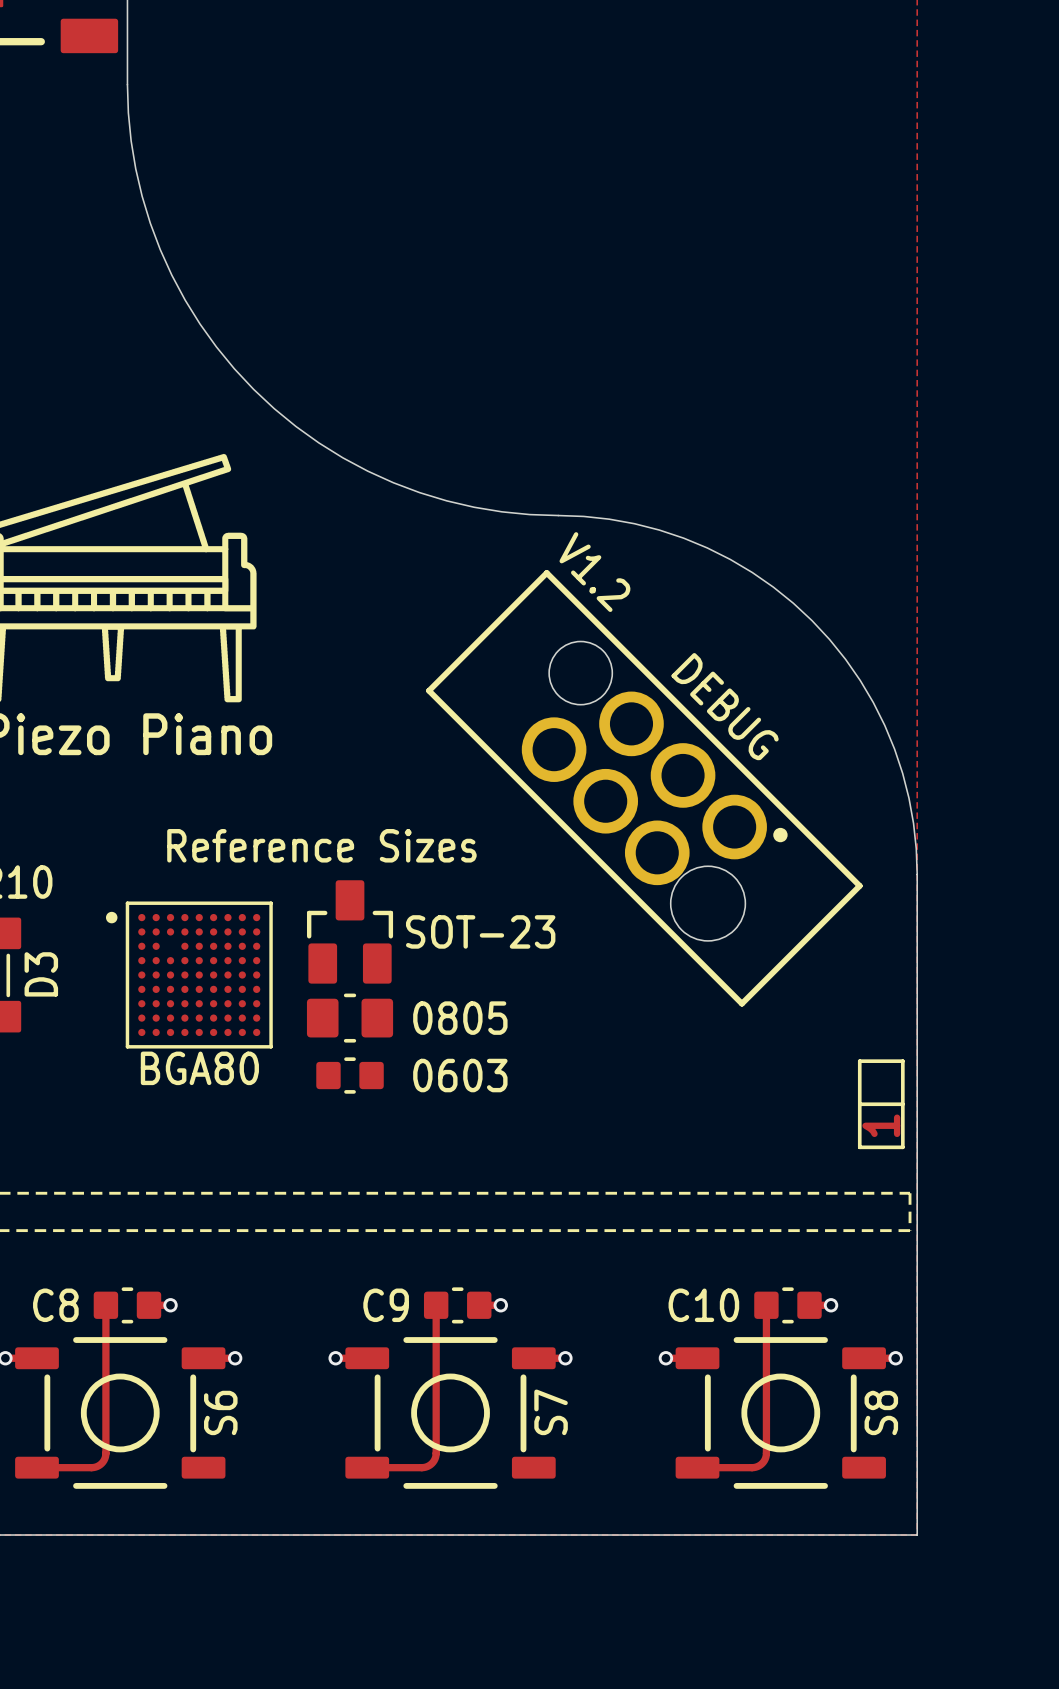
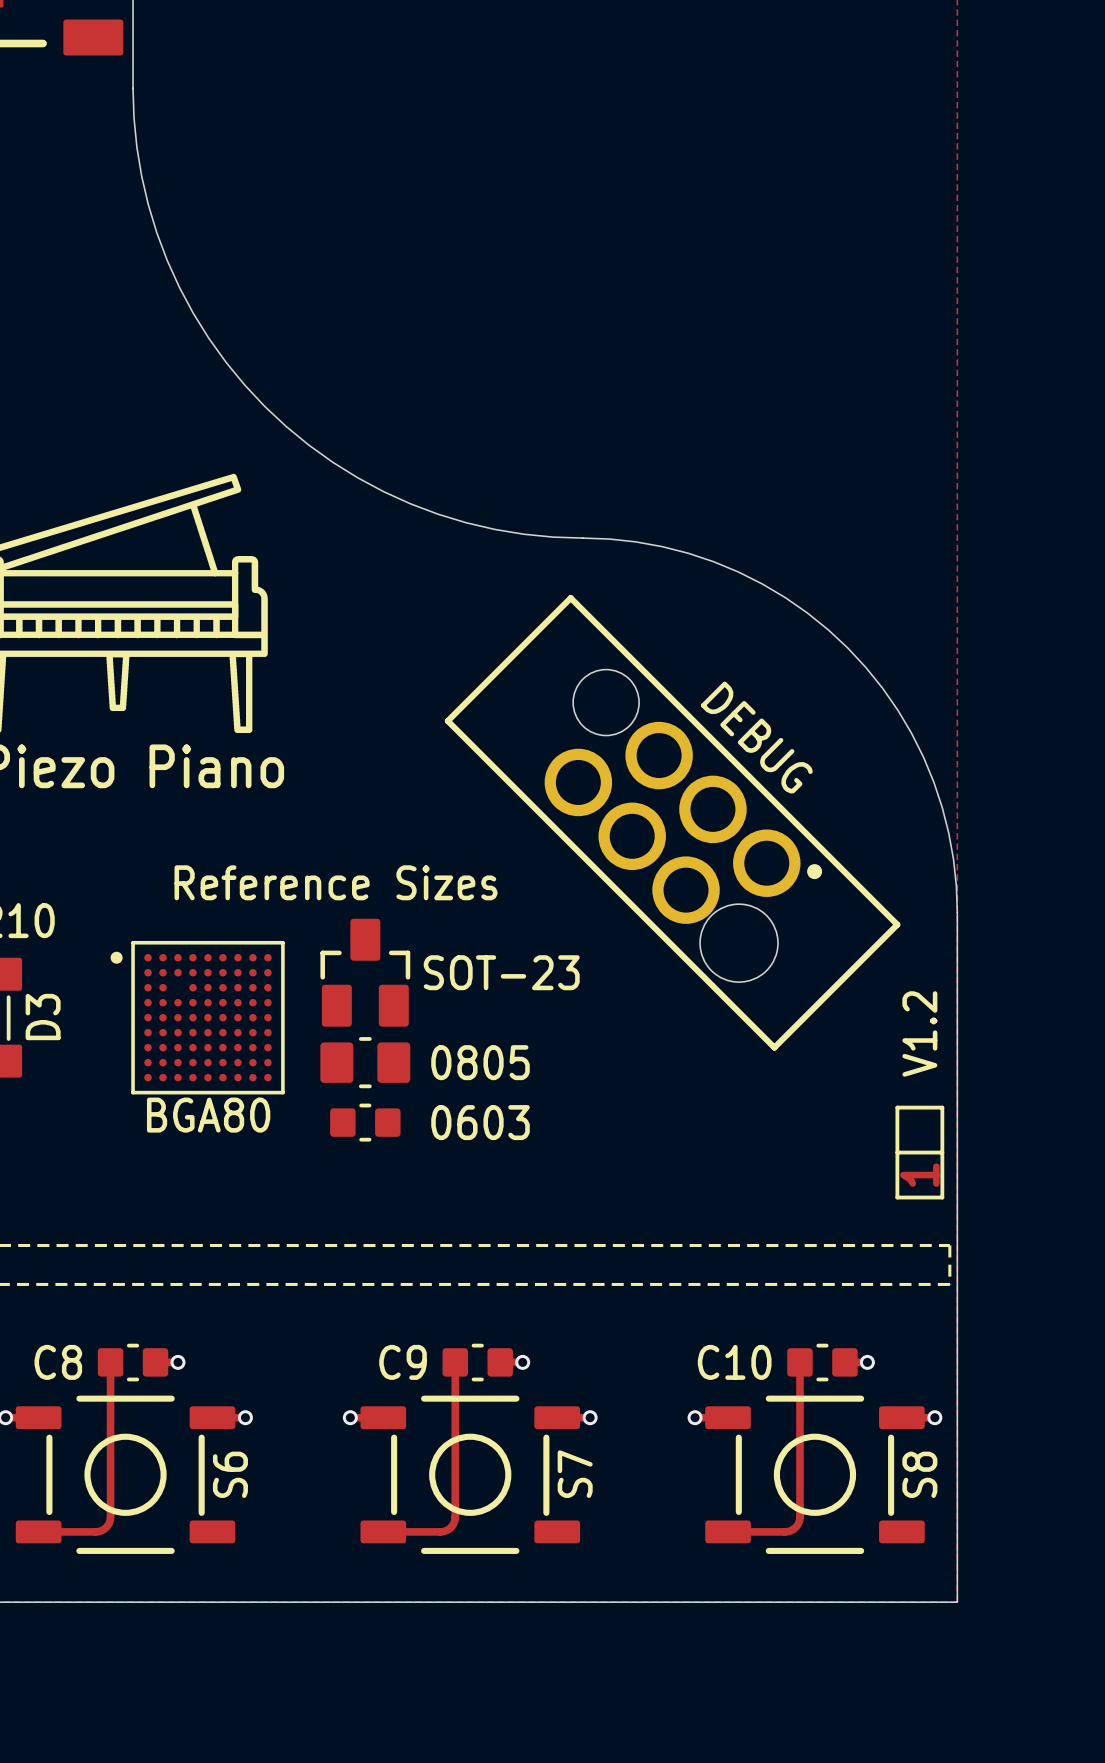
text rotation: 0° (594, 572) -> 135° counterclockwise (919, 1033)
text position: V1.2 (594, 572) -> V1.2 (919, 1033)

